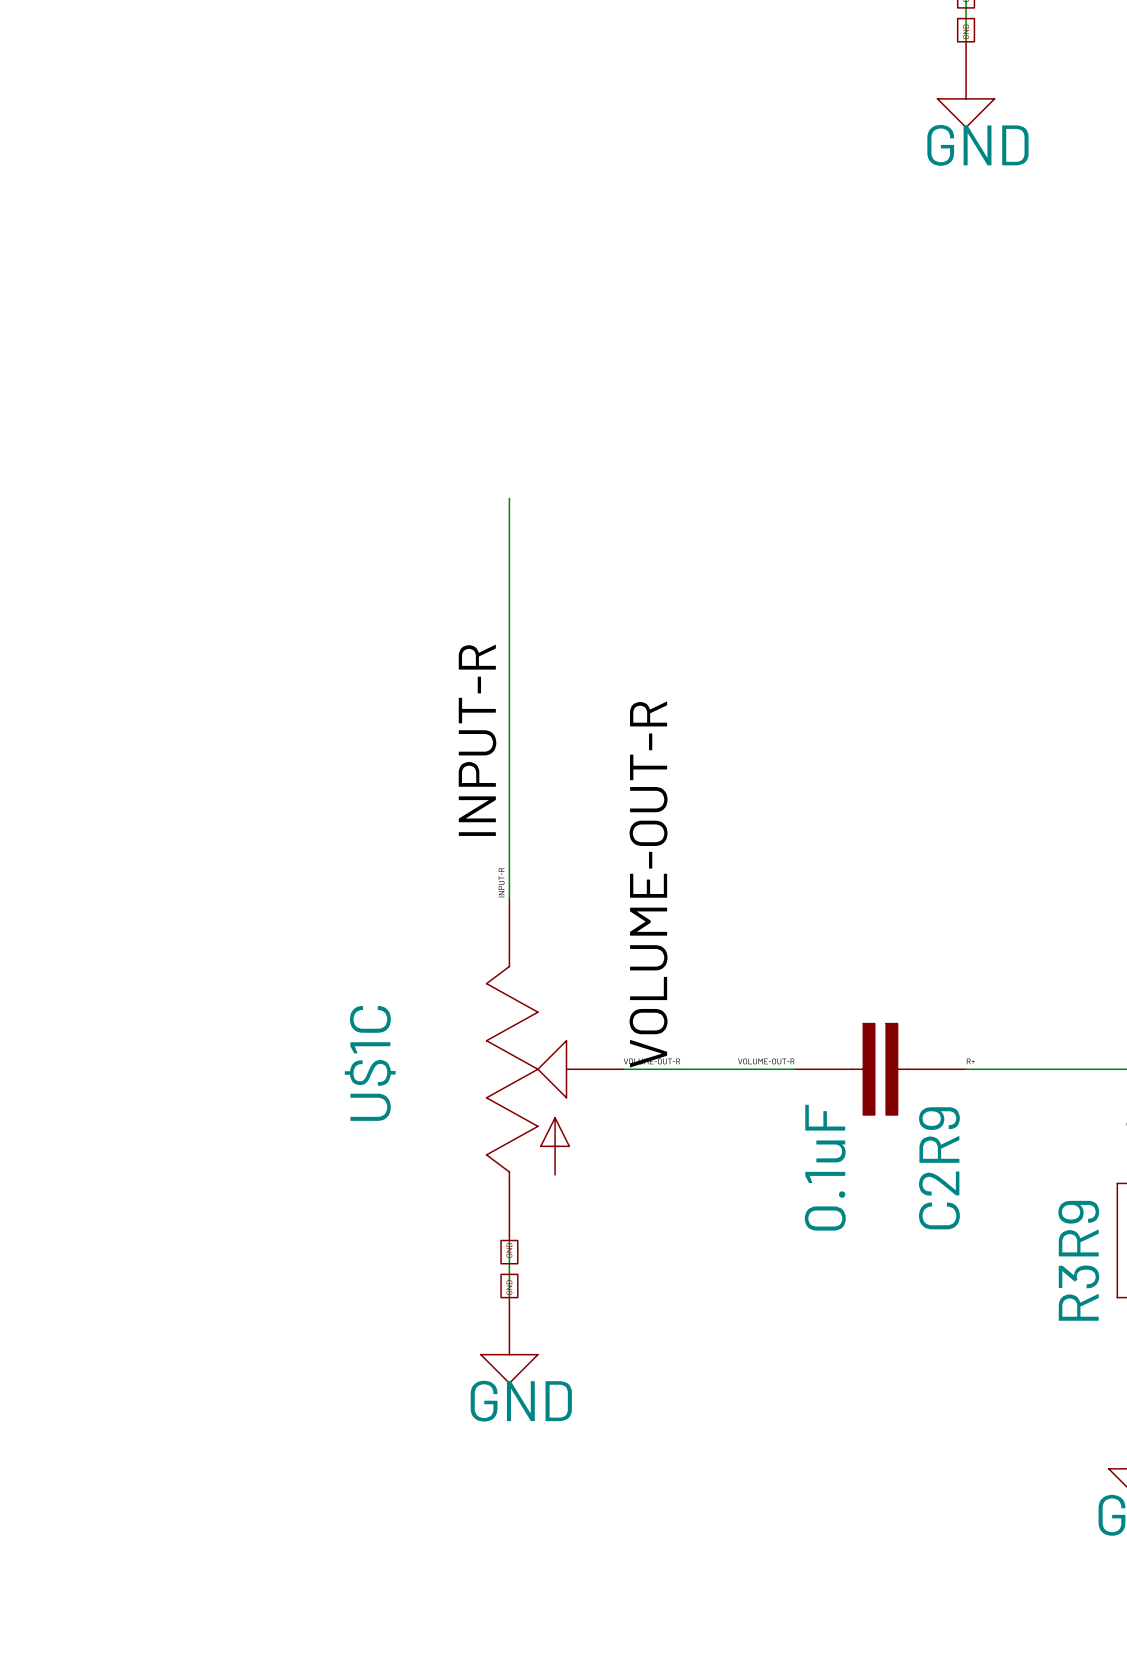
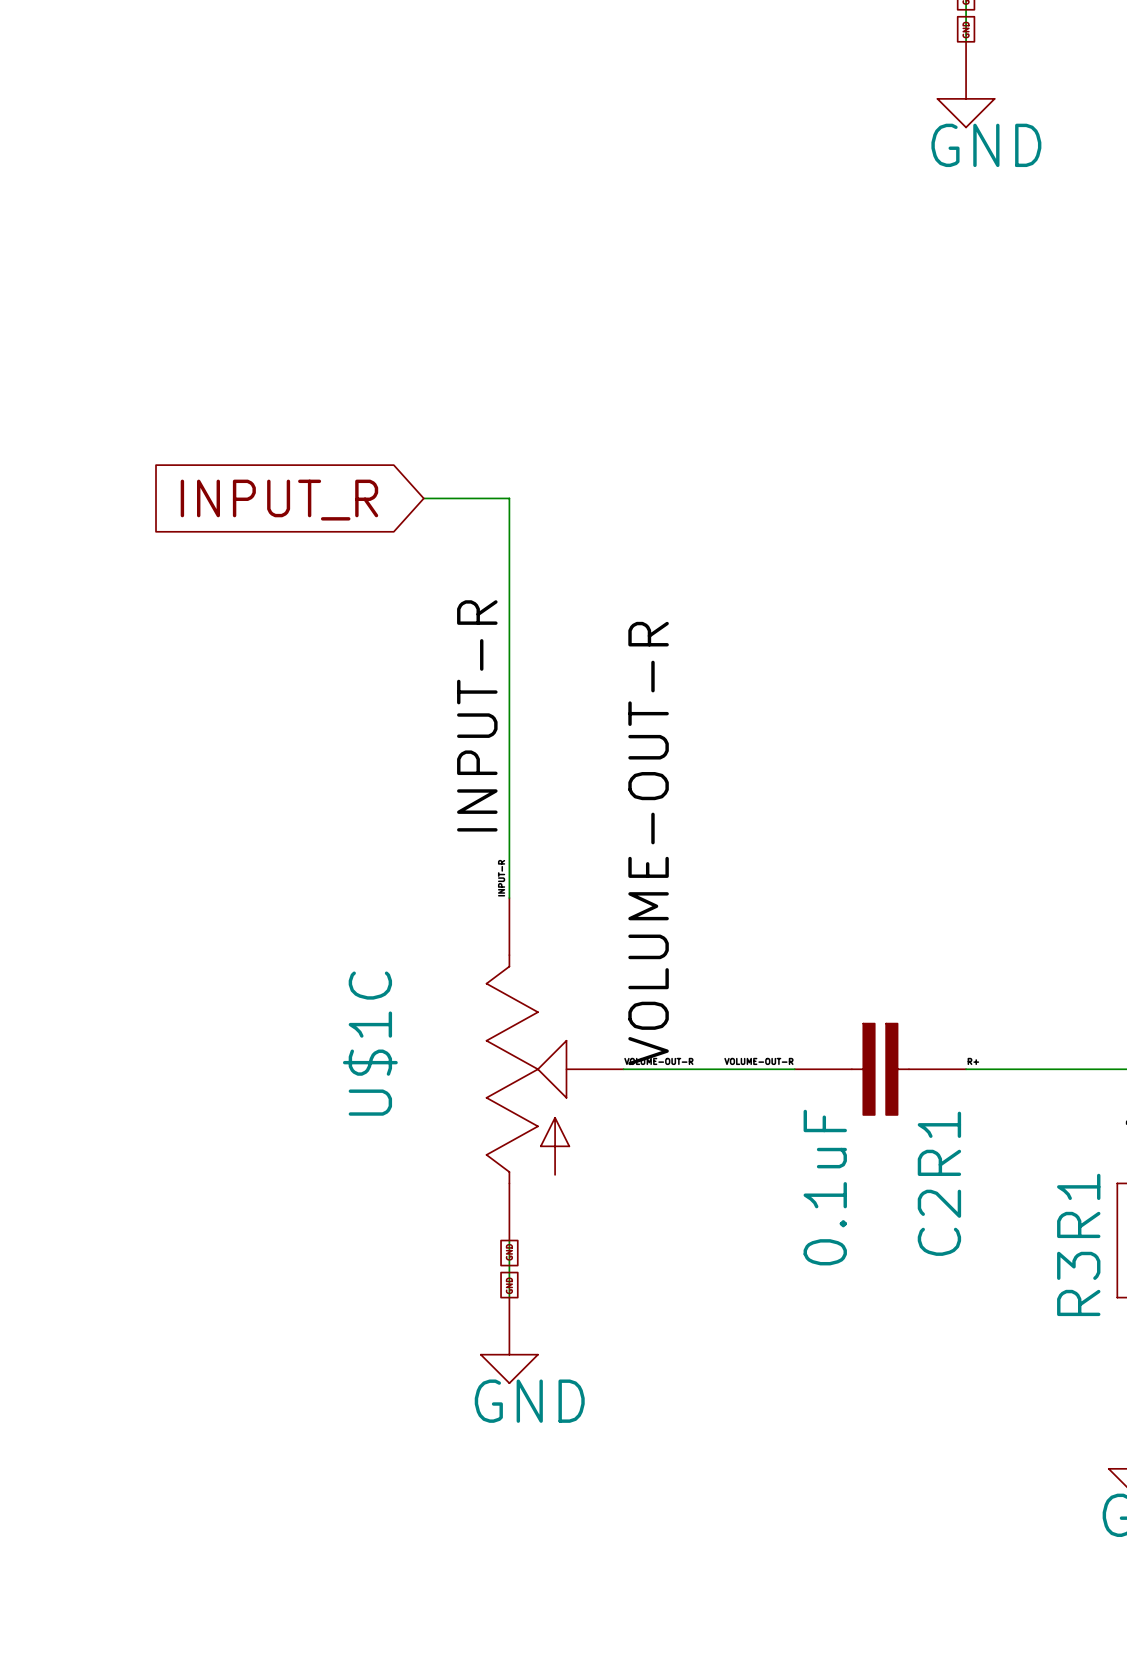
global label: none -> INPUT_R (279, 500)
wire: none -> (423, 498) (509, 498)
C2R9 name: C2R9 (939, 1168) -> C2R1 (939, 1183)
R3R9 name: R3R9 (1078, 1260) -> R3R1 (1078, 1244)

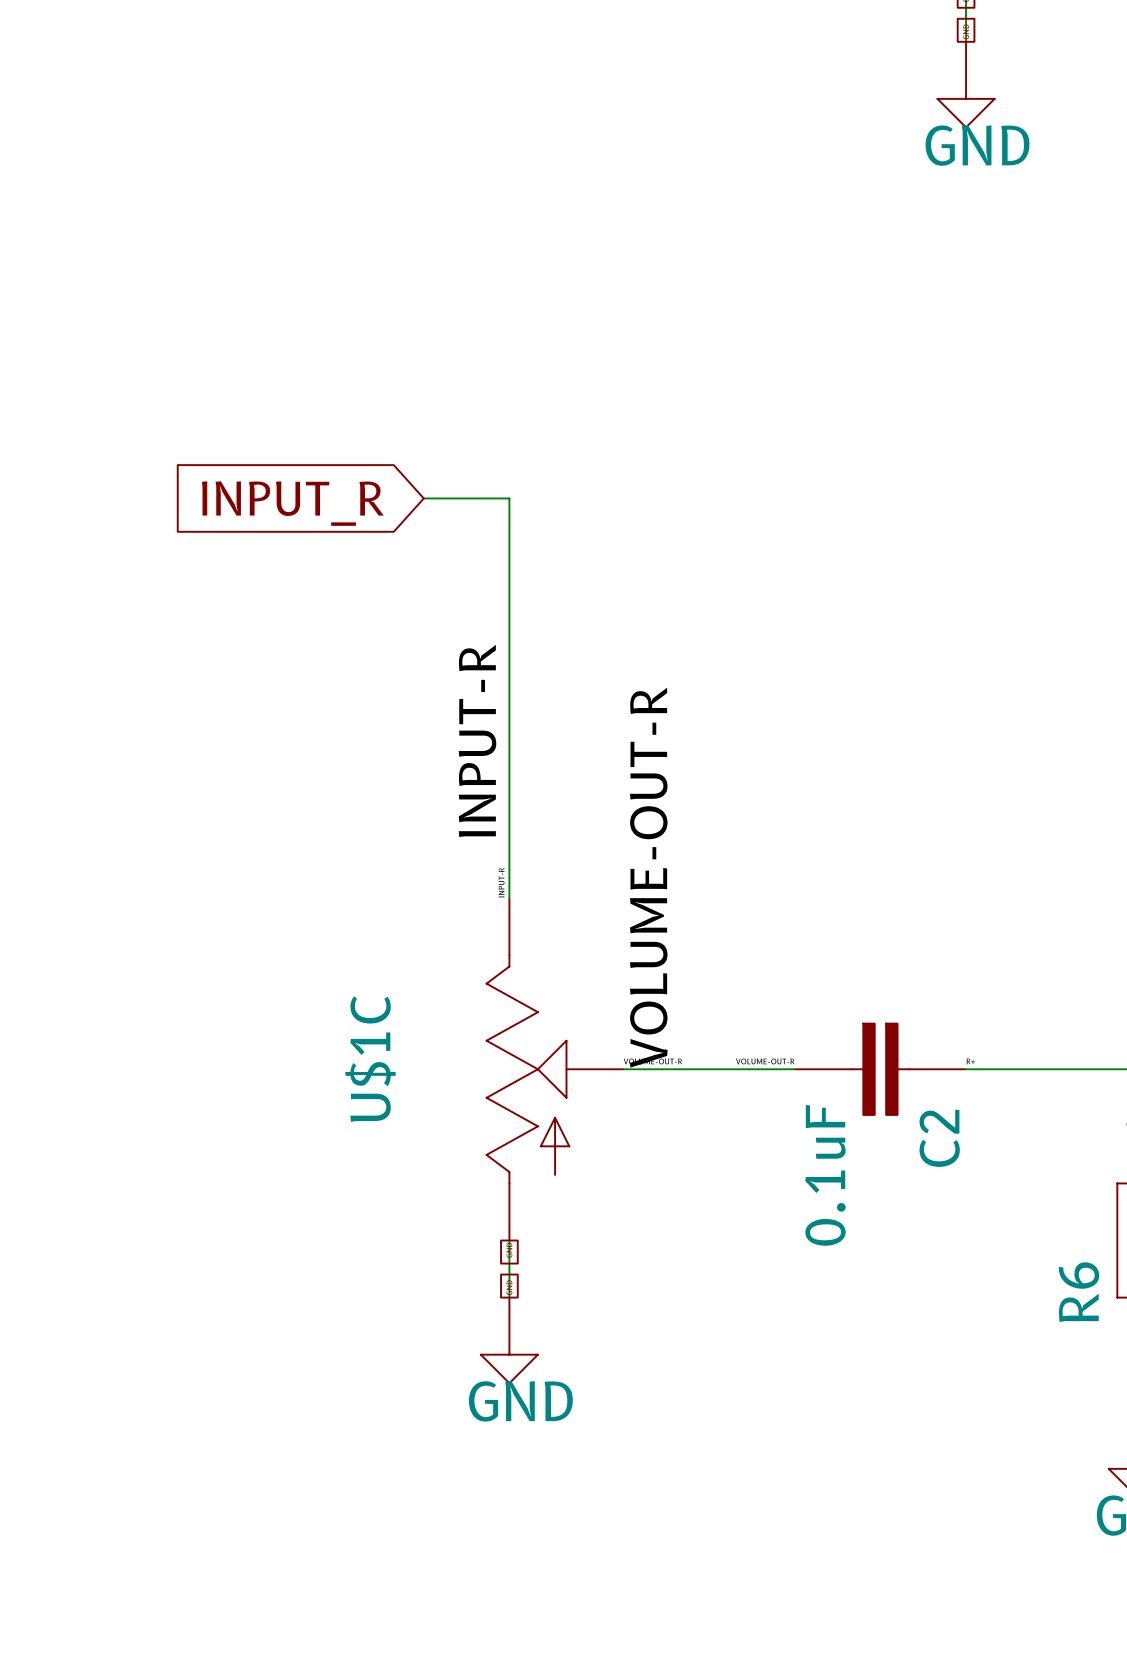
C2R1 name: C2R1 (939, 1183) -> C2 (939, 1138)
R3R1 name: R3R1 (1078, 1244) -> R6 (1079, 1292)

